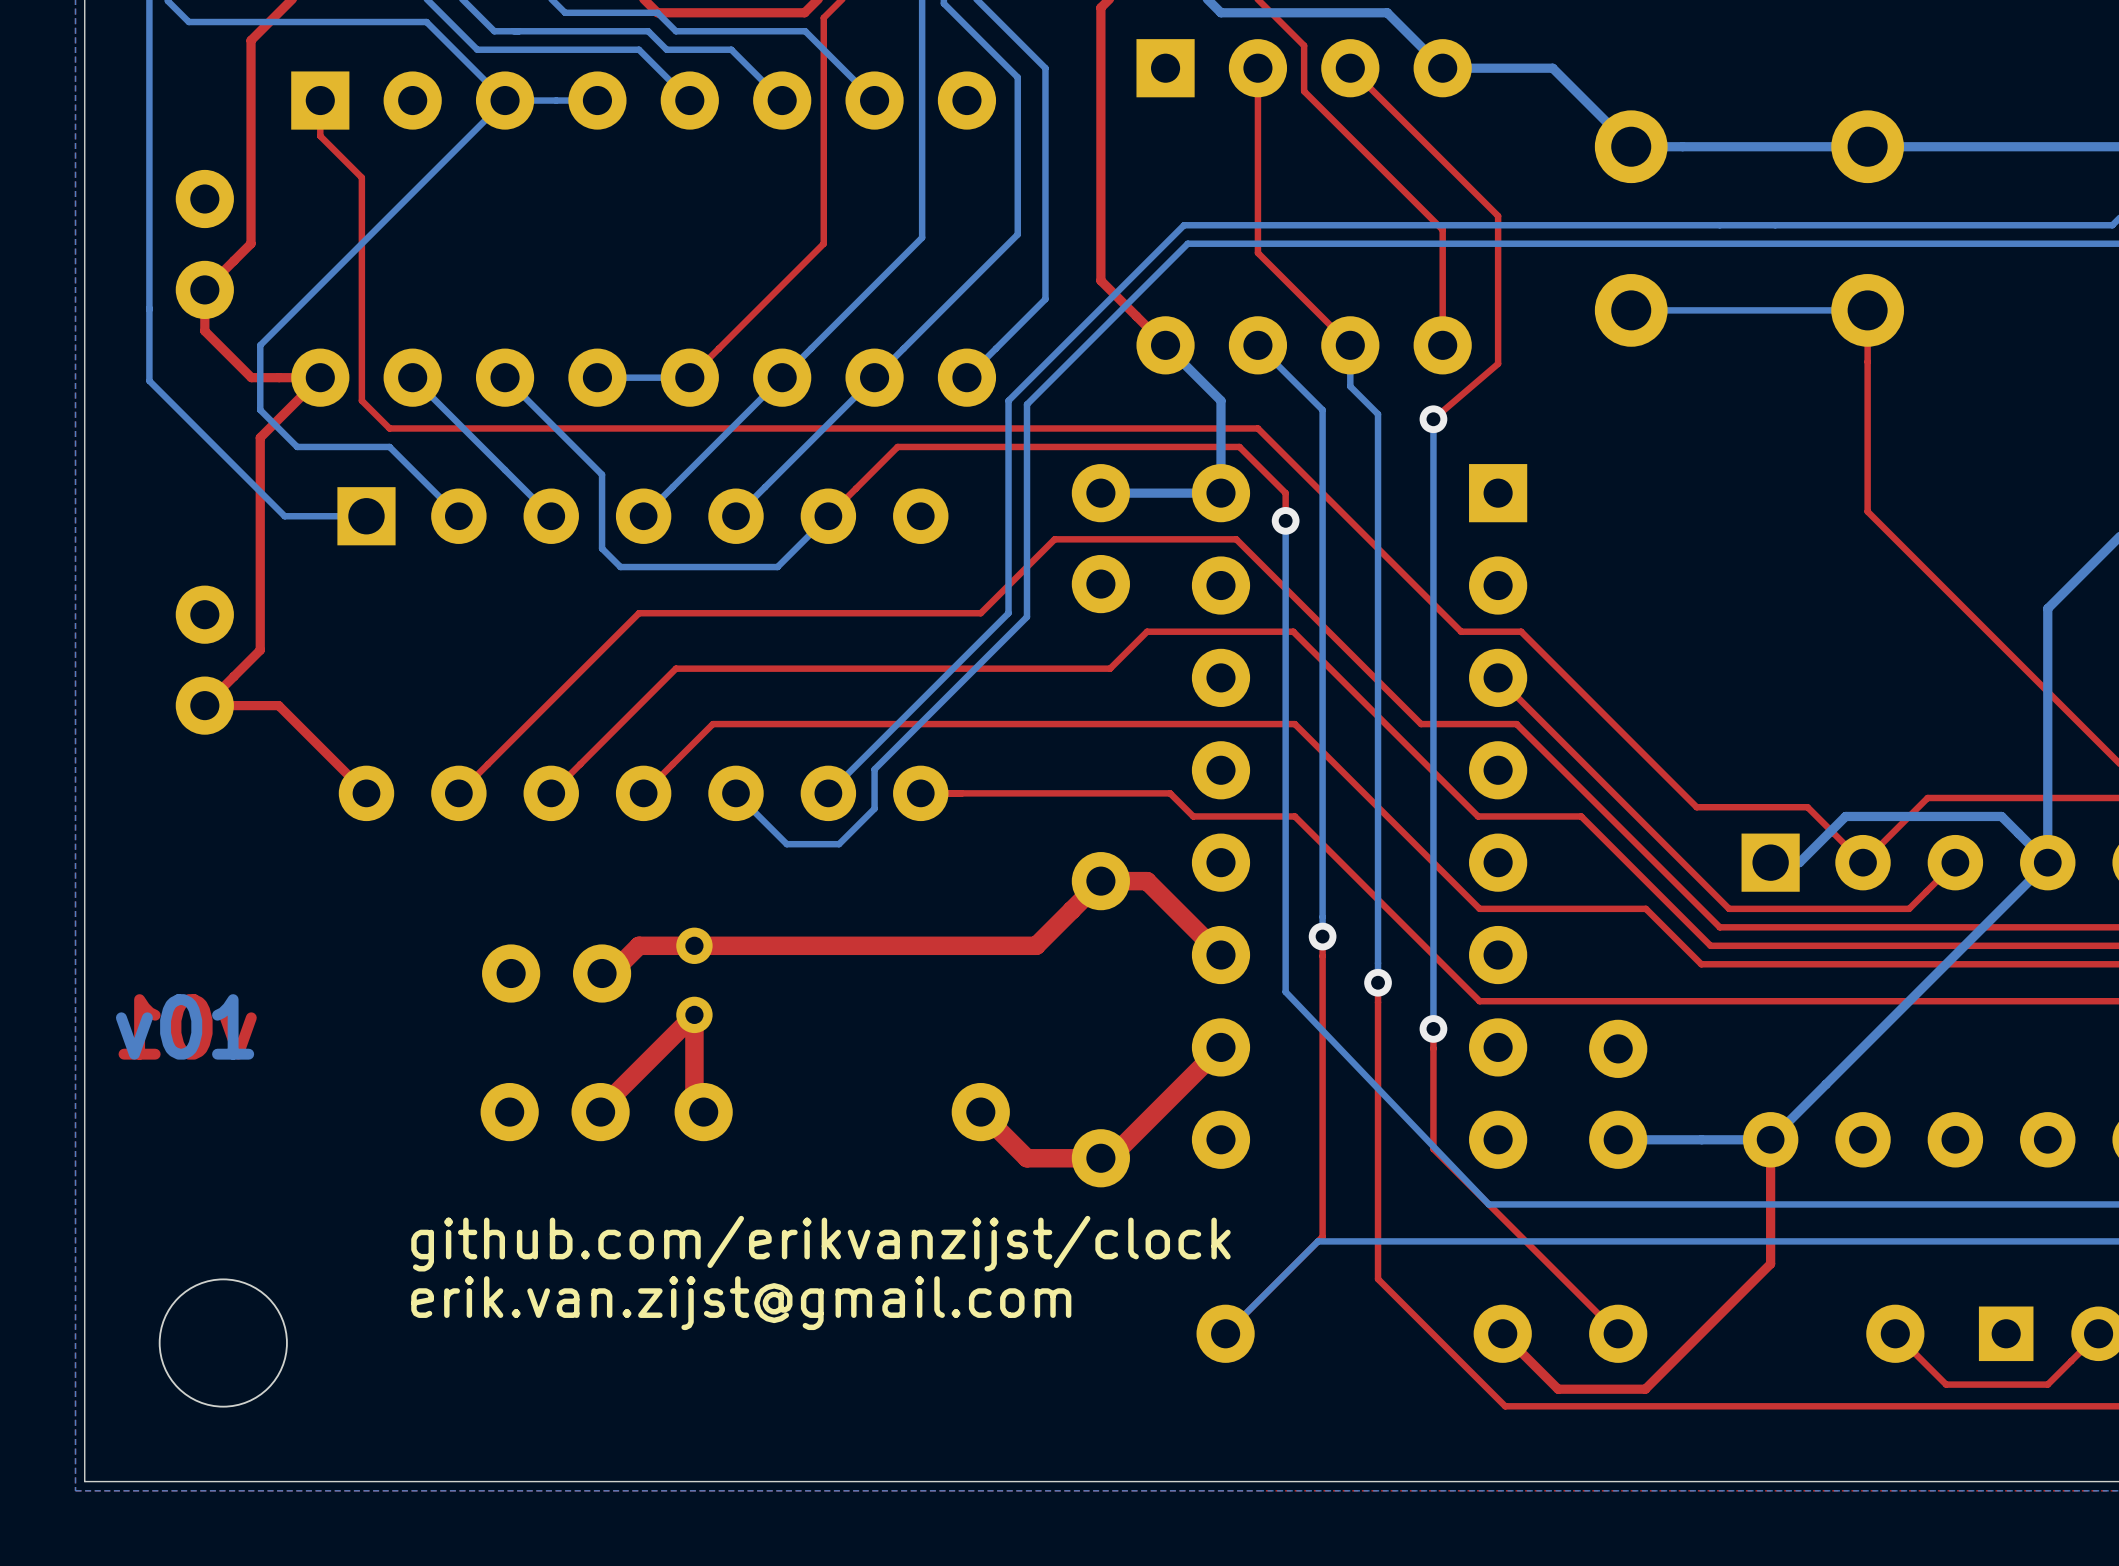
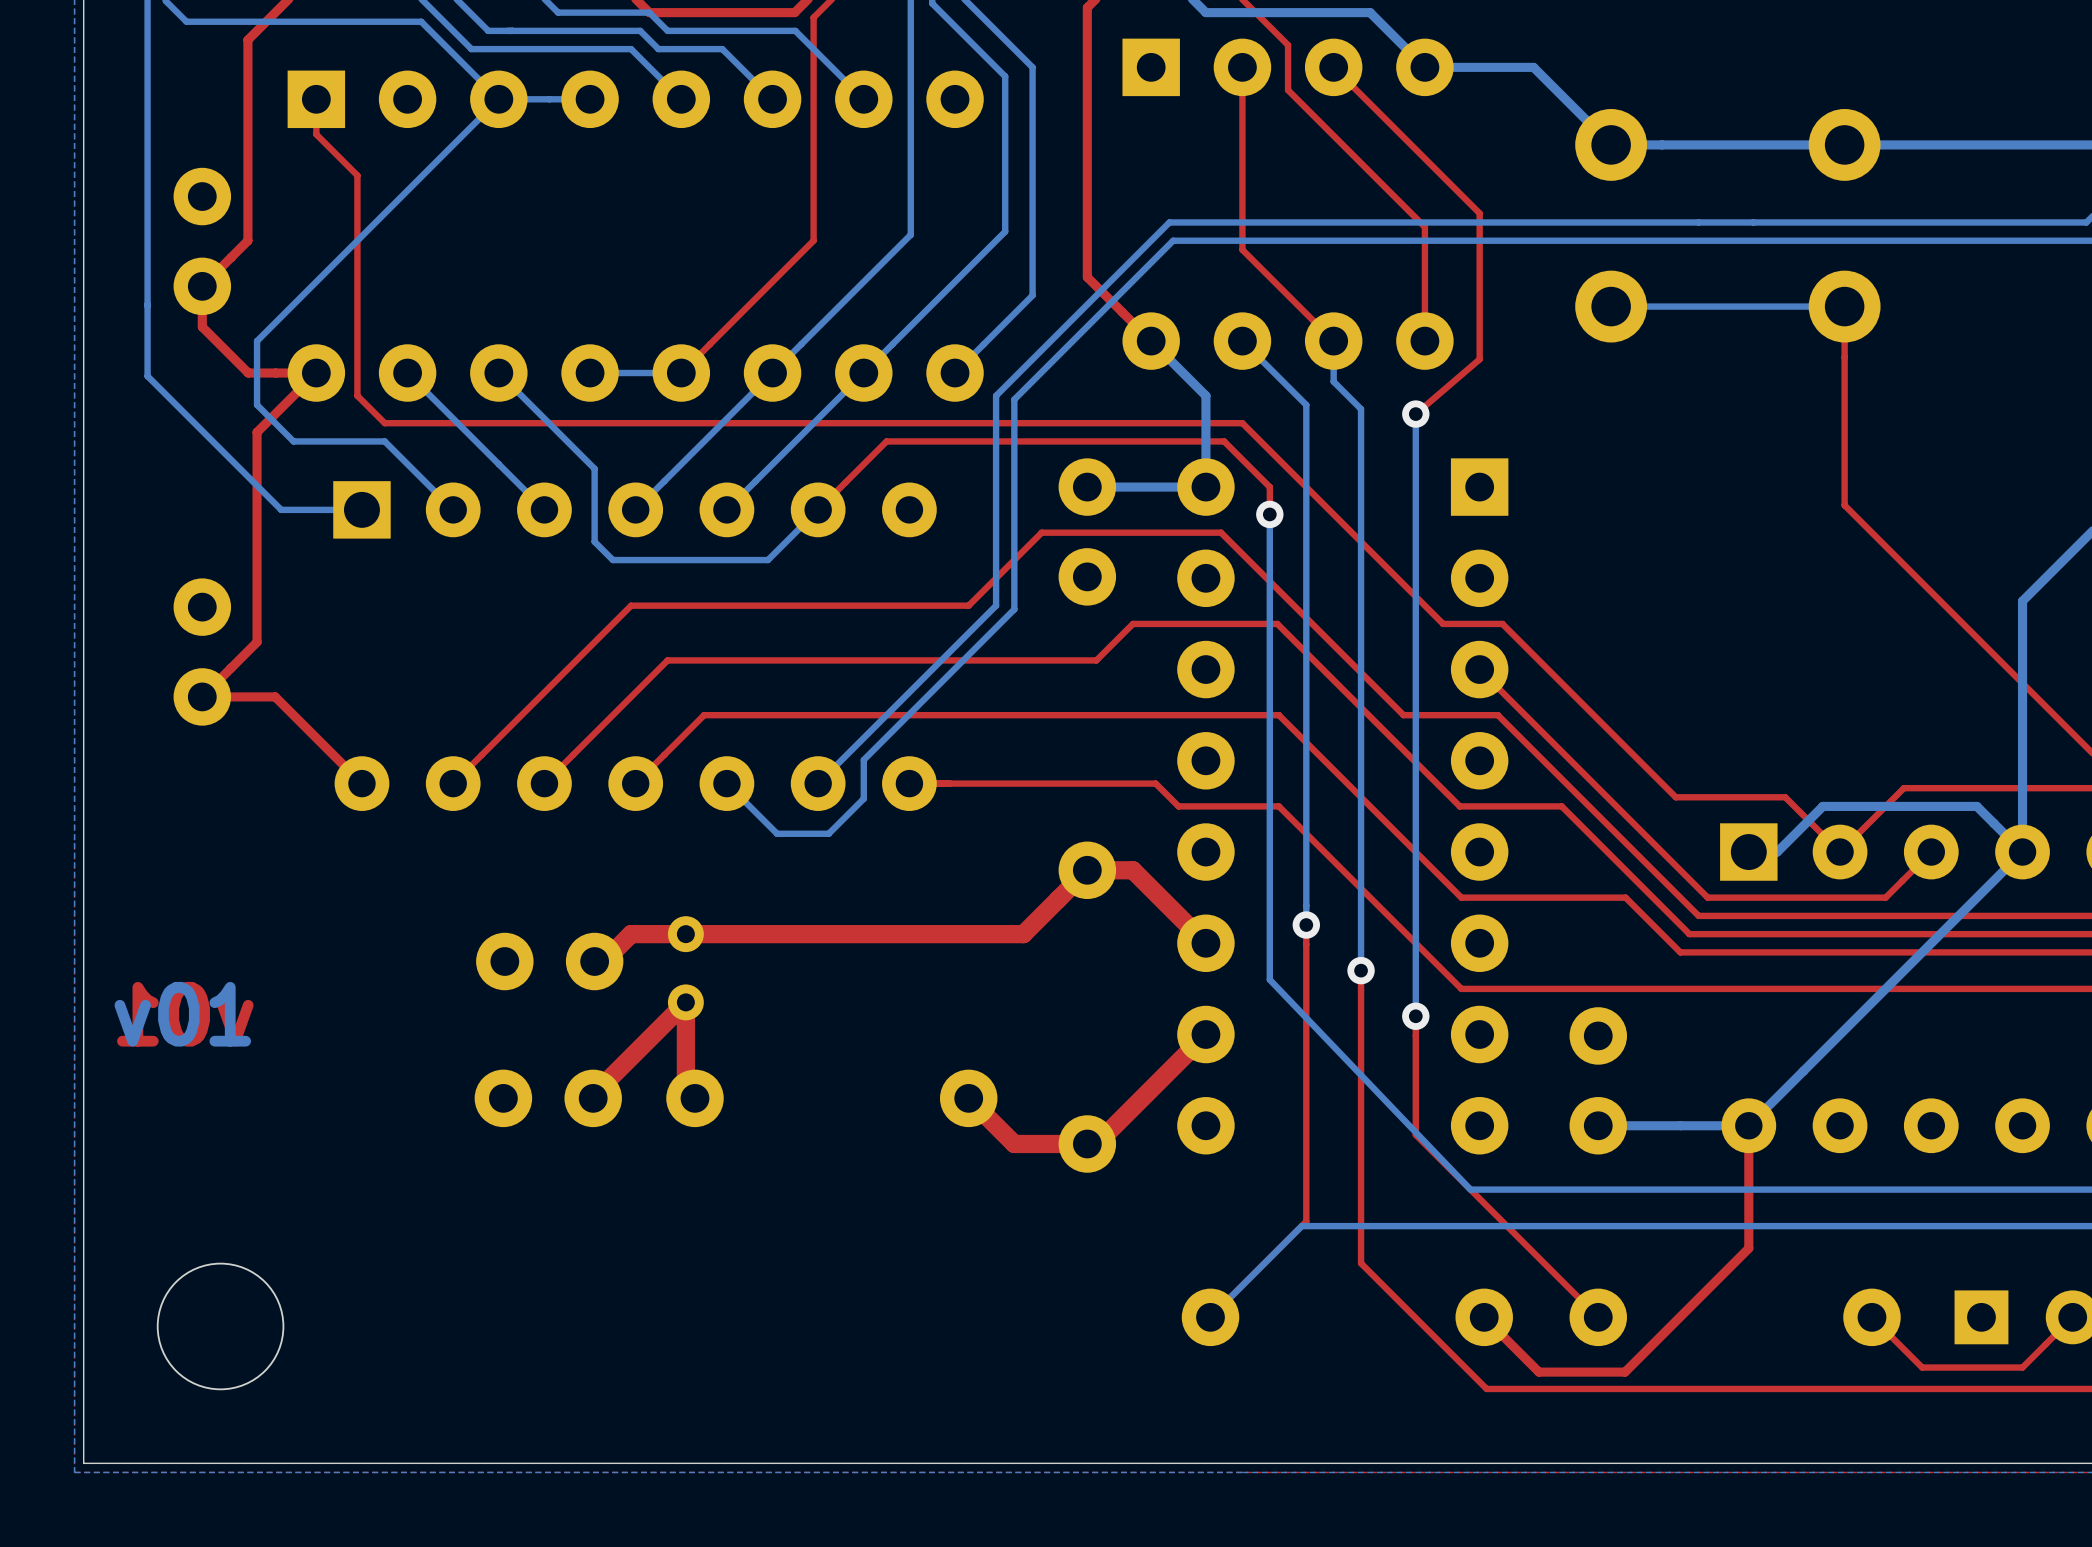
text: github.com/erikvanzijst/clock (820, 1243) -> none
text: erik.van.zijst@gmail.com (741, 1303) -> none

